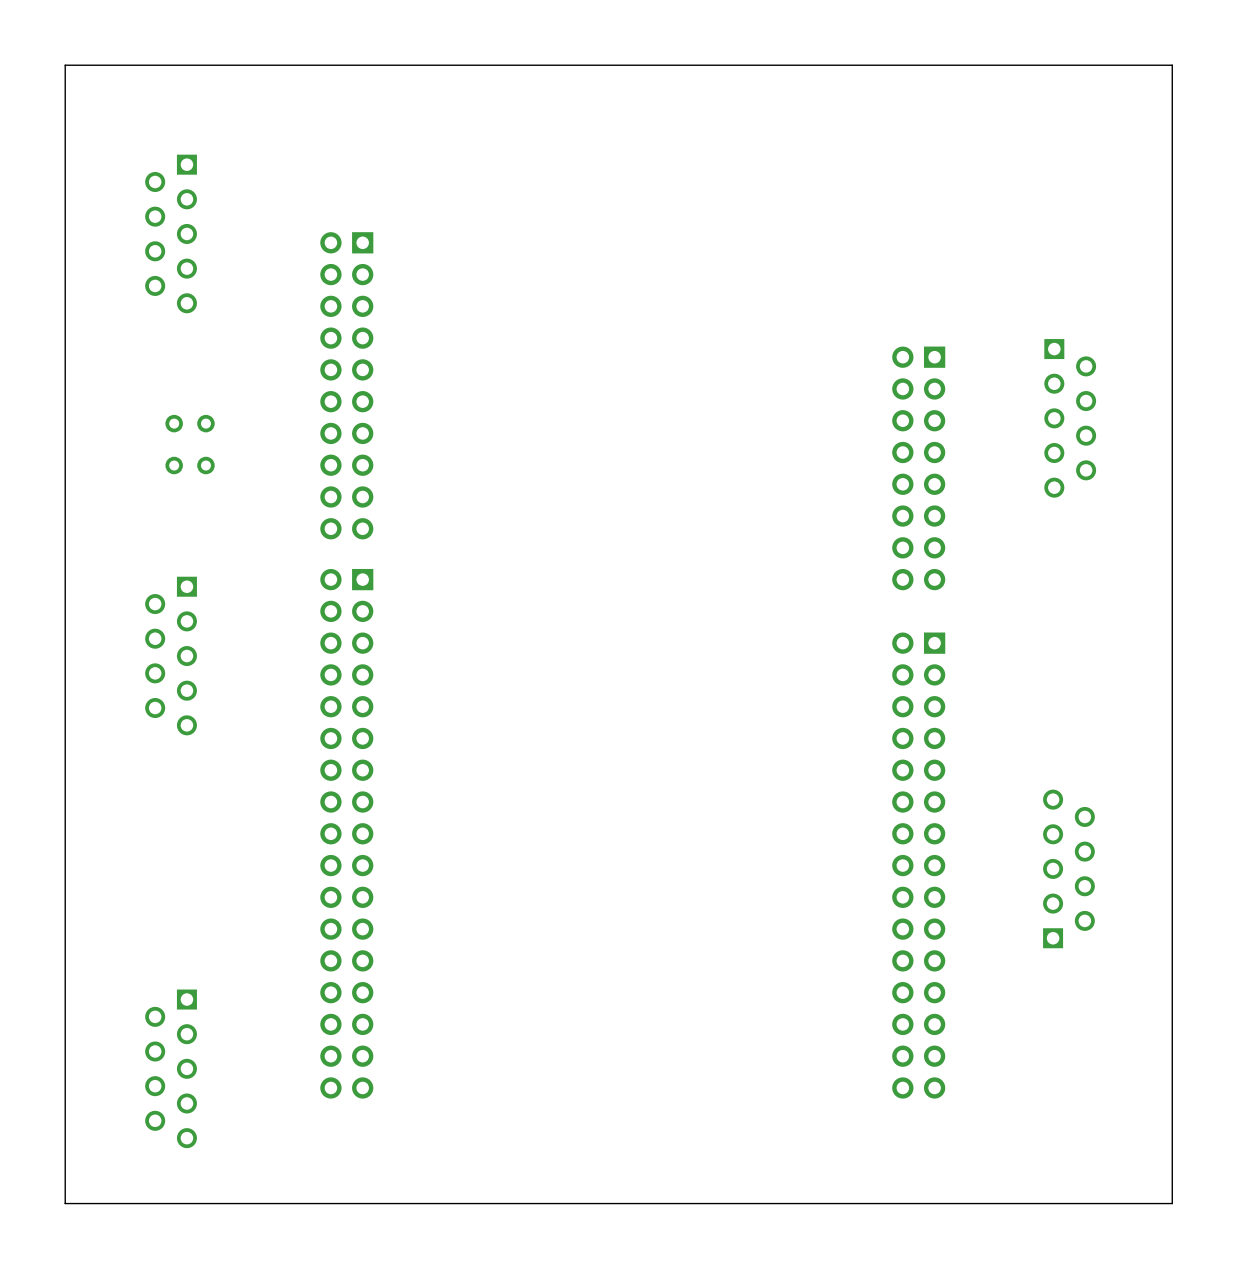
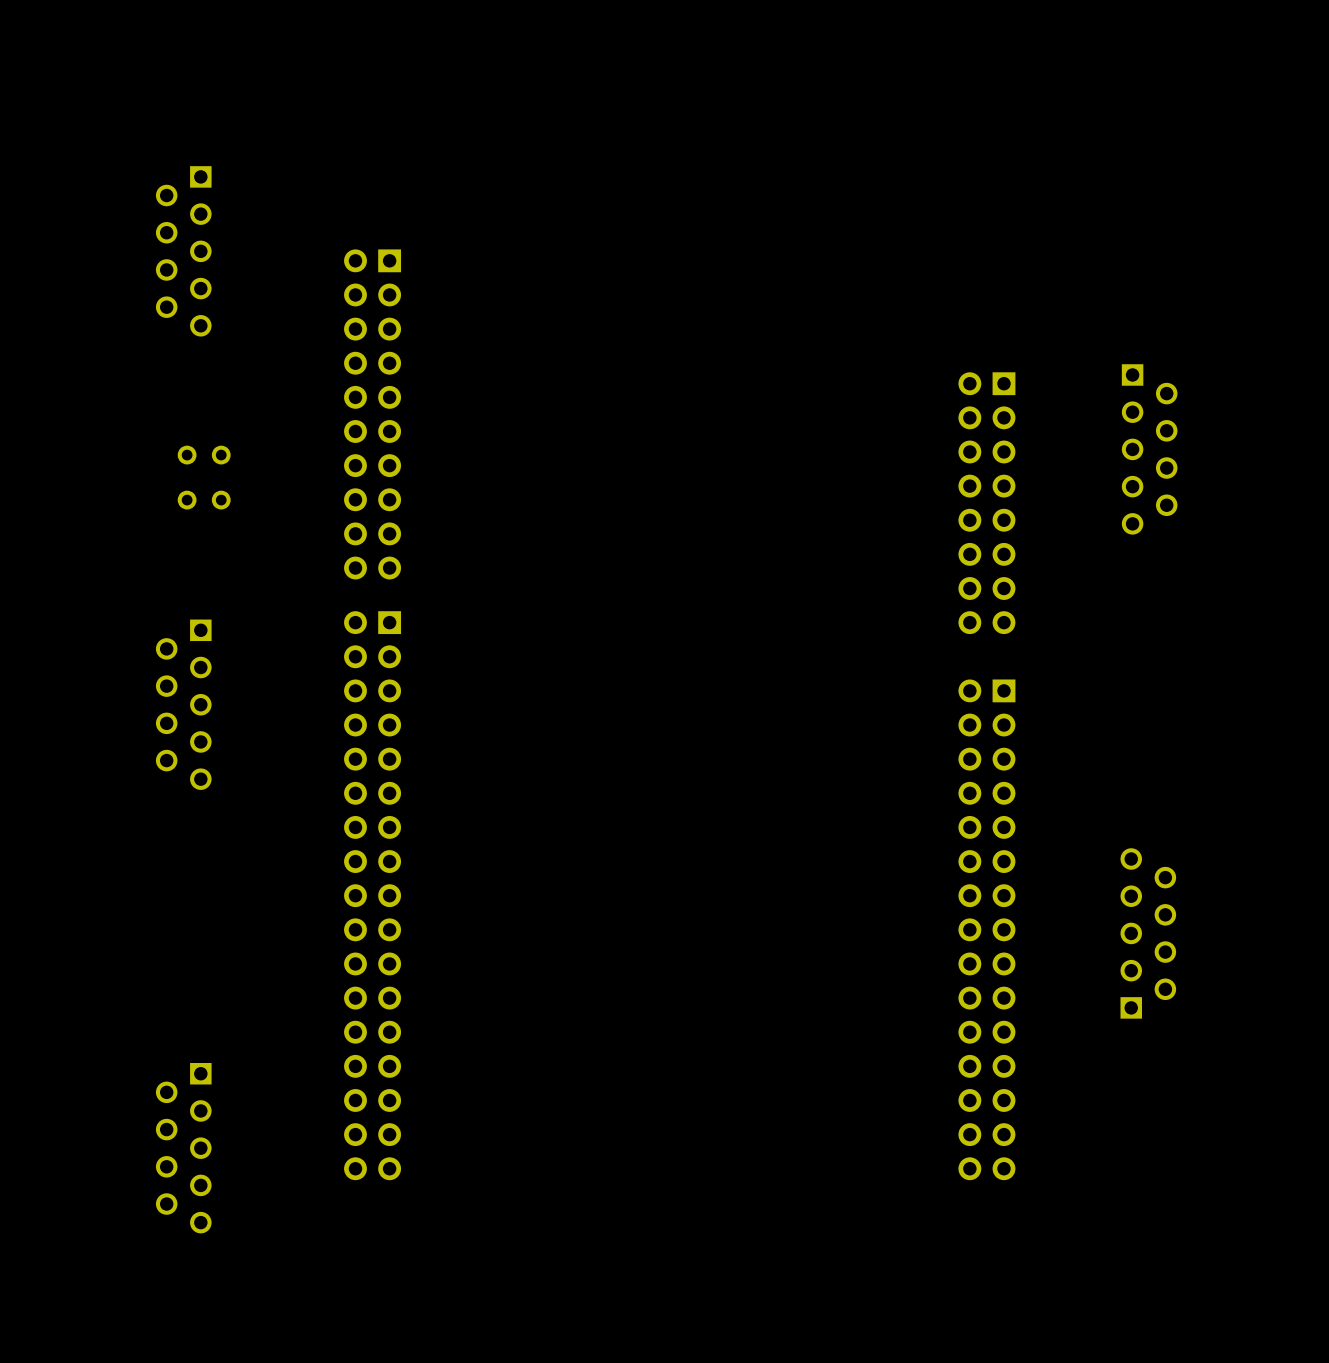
board edge: (1172, 65) (65, 65) (65, 1203) (1172, 1203) (1172, 65) -> none

